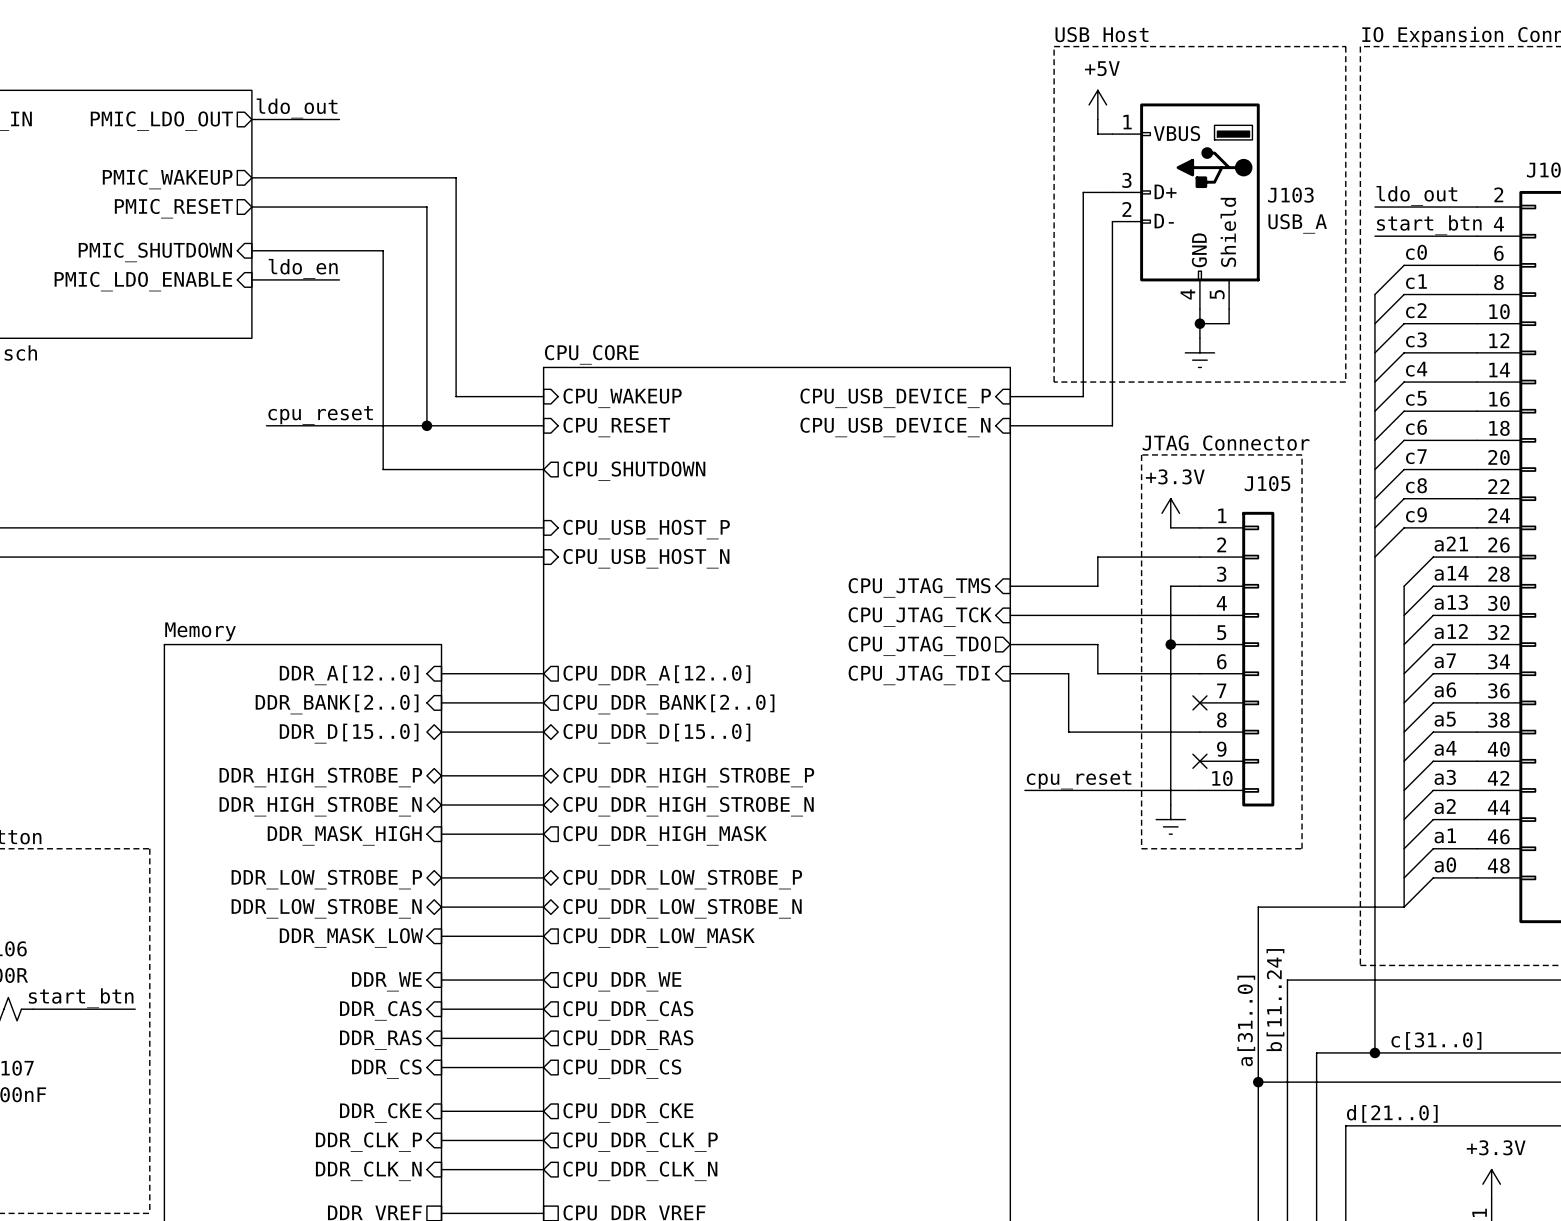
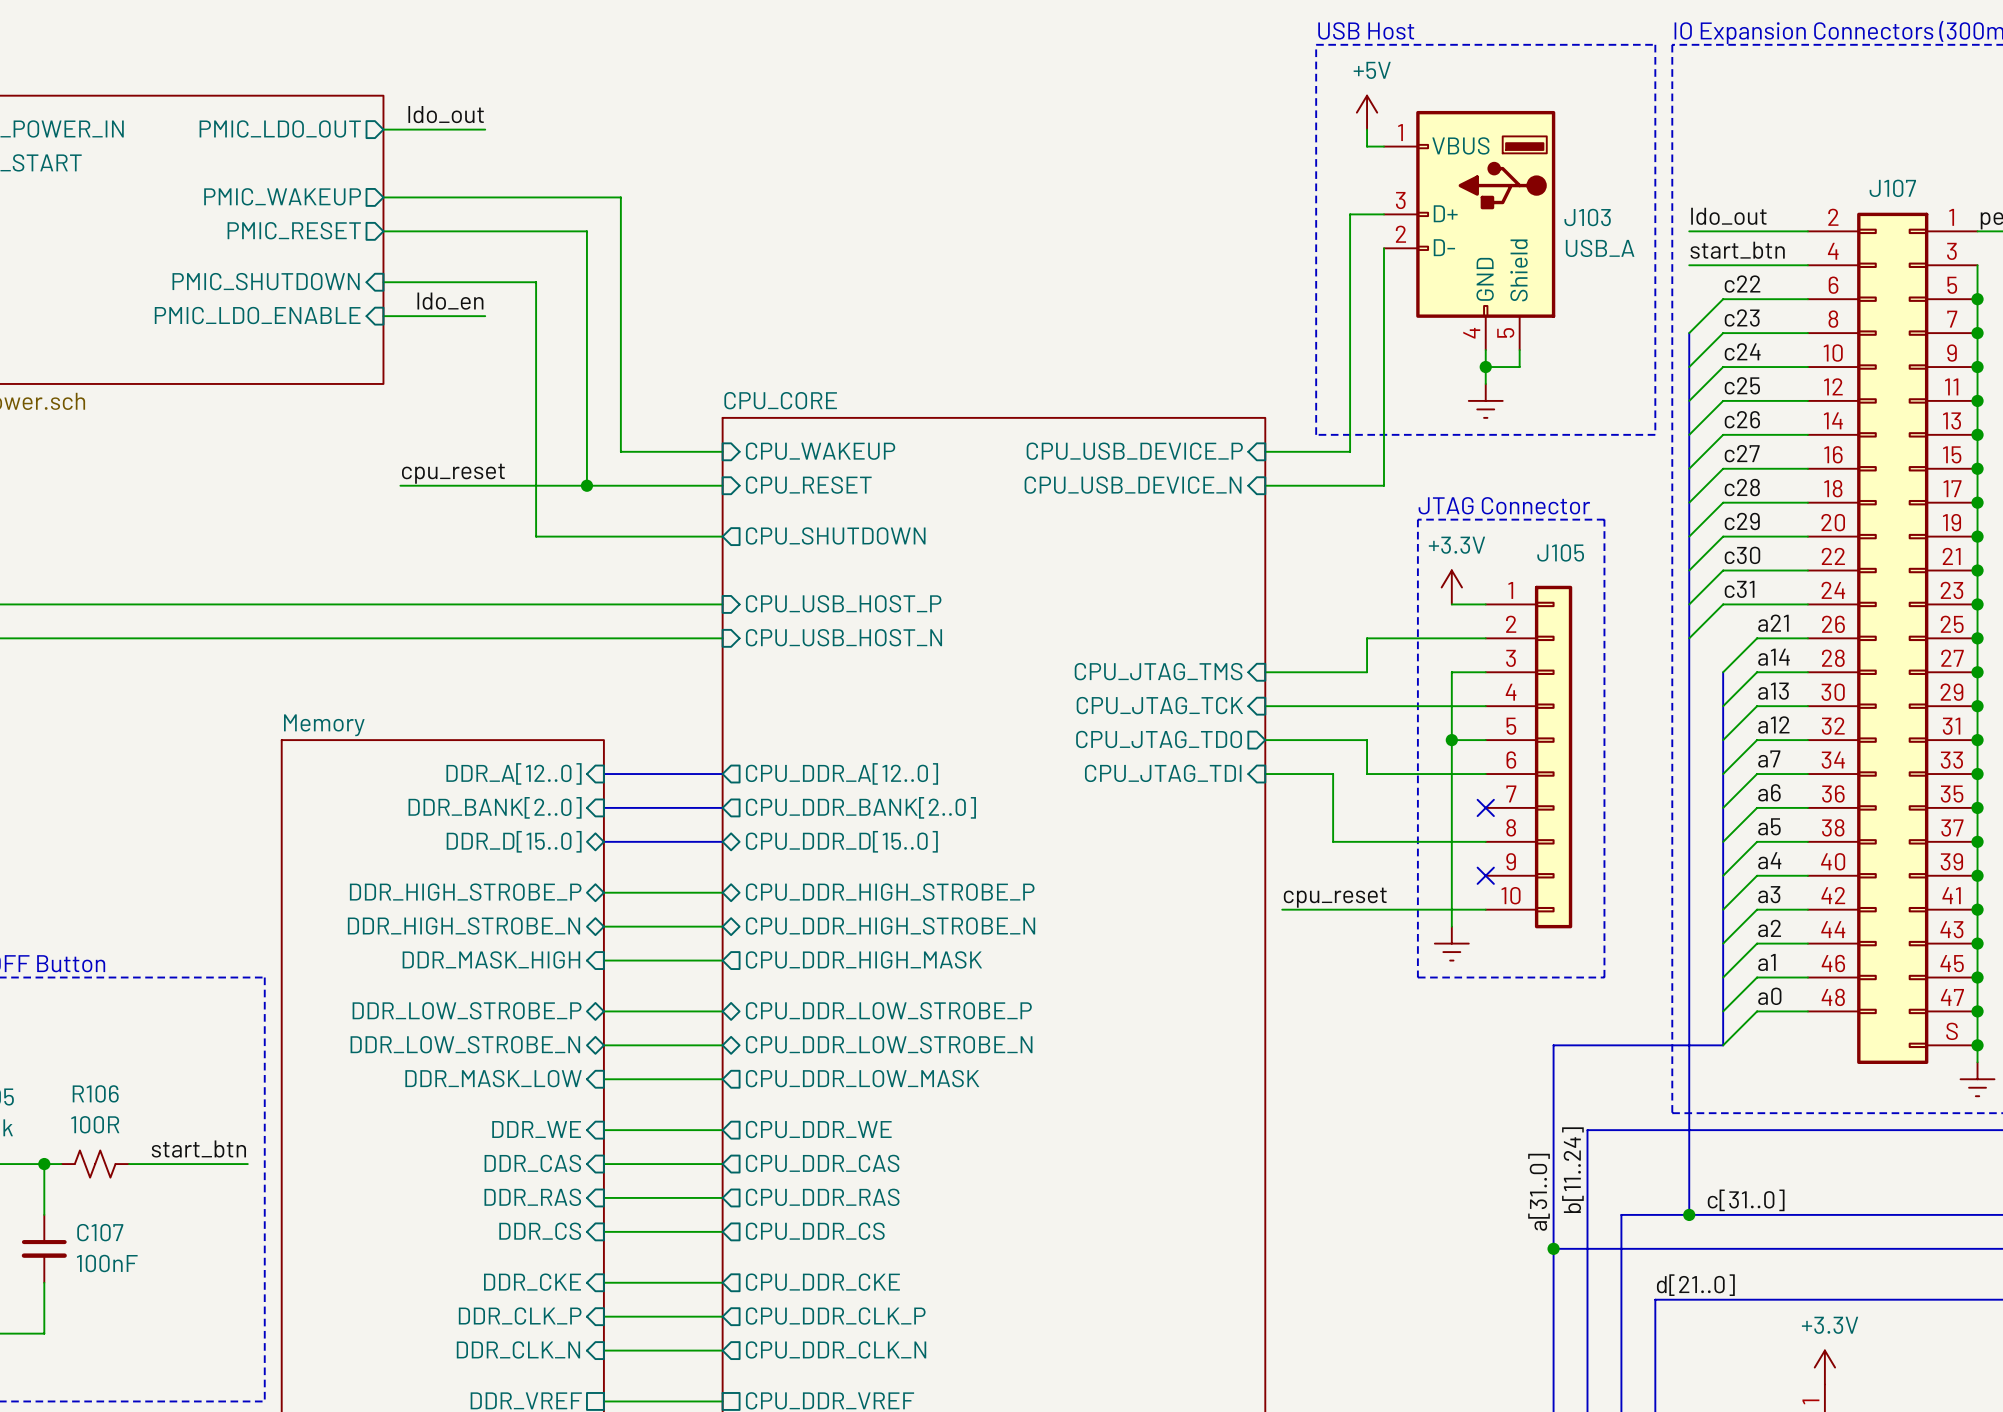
label: c0 (1416, 252) -> c22 (1742, 284)
label: c1 (1416, 281) -> c23 (1742, 317)
label: c2 (1416, 310) -> c24 (1742, 351)
label: c3 (1416, 339) -> c25 (1742, 385)
label: c4 (1416, 369) -> c26 (1742, 419)
label: c5 (1416, 398) -> c27 (1742, 453)
label: c6 (1416, 427) -> c28 (1742, 487)
label: c7 (1416, 456) -> c29 (1742, 521)
label: c8 (1416, 485) -> c30 (1742, 555)
label: c9 (1416, 514) -> c31 (1739, 589)

